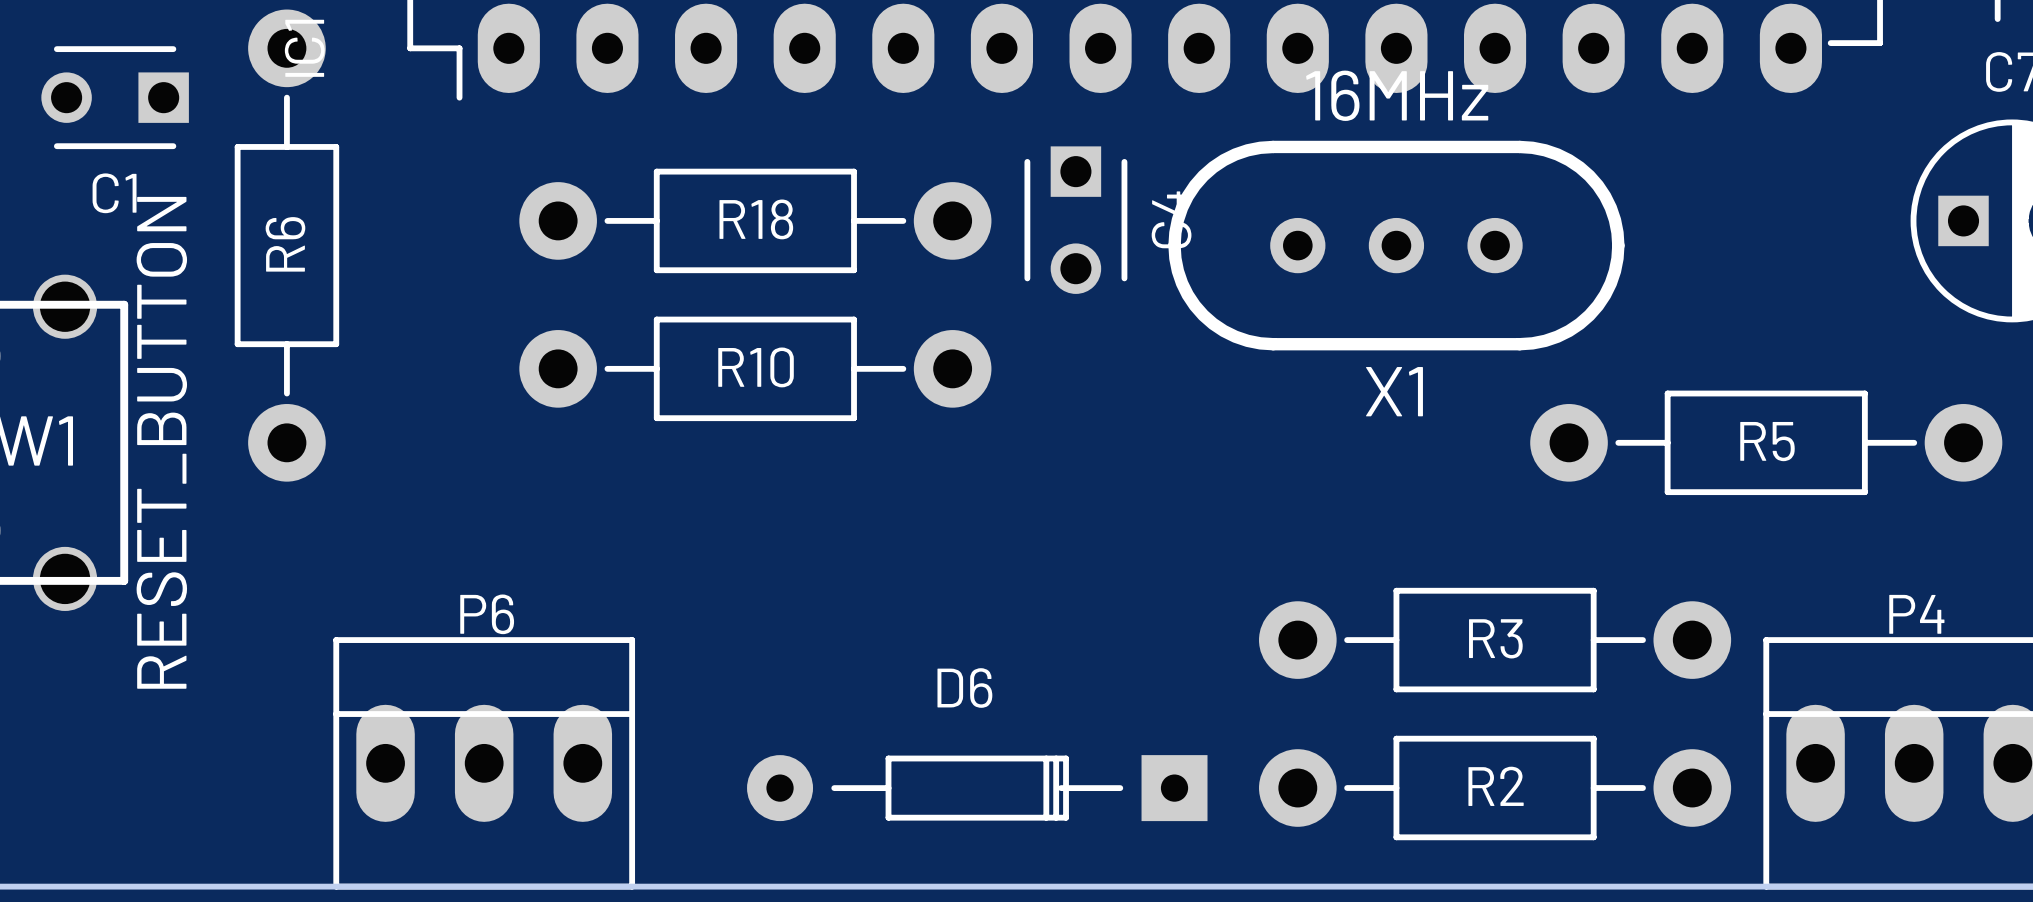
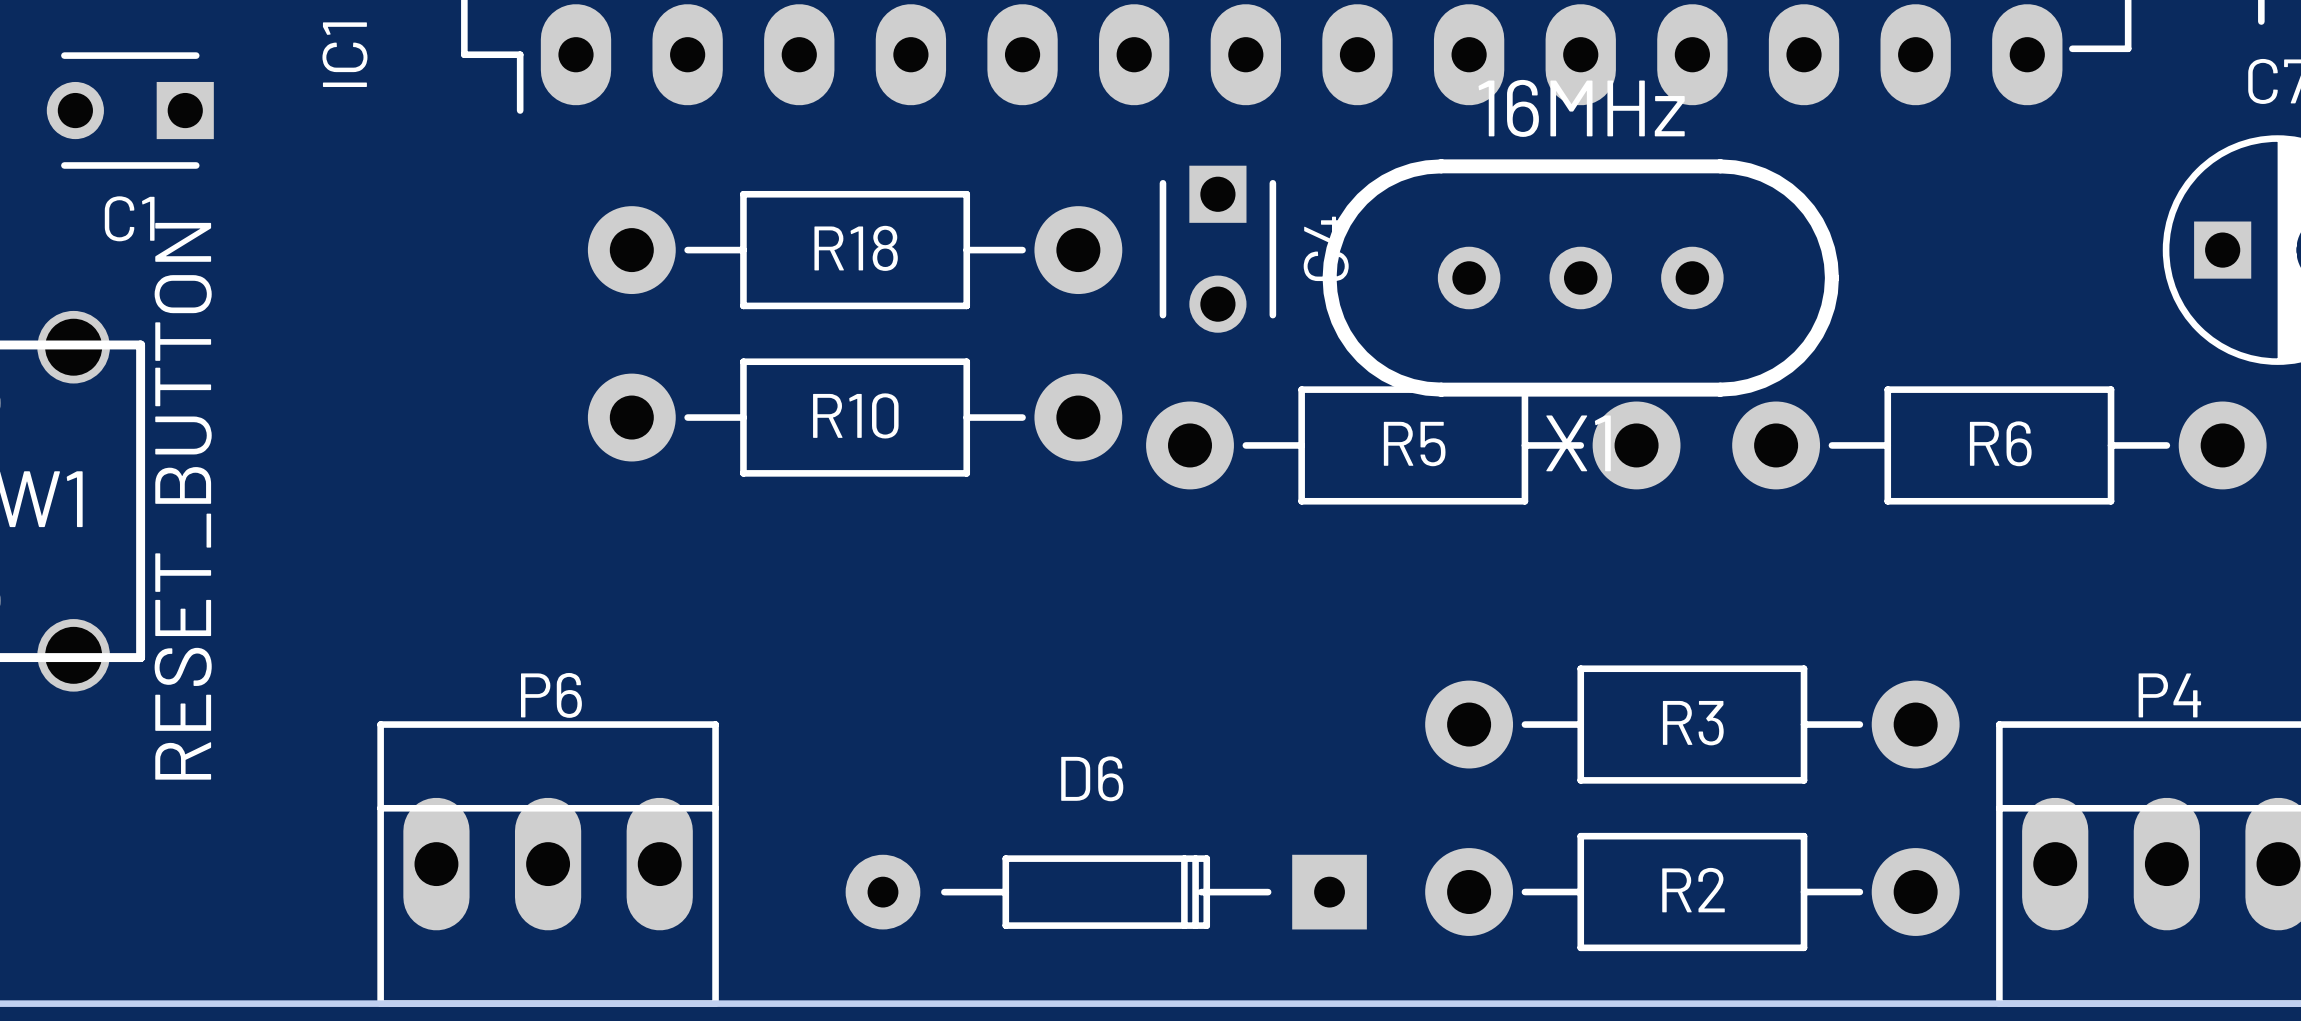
R6 rotation: 0° (286, 245) -> 90° clockwise (1999, 445)
R6 position: (286, 245) -> (1999, 445)
R5 position: (1766, 442) -> (1413, 445)

